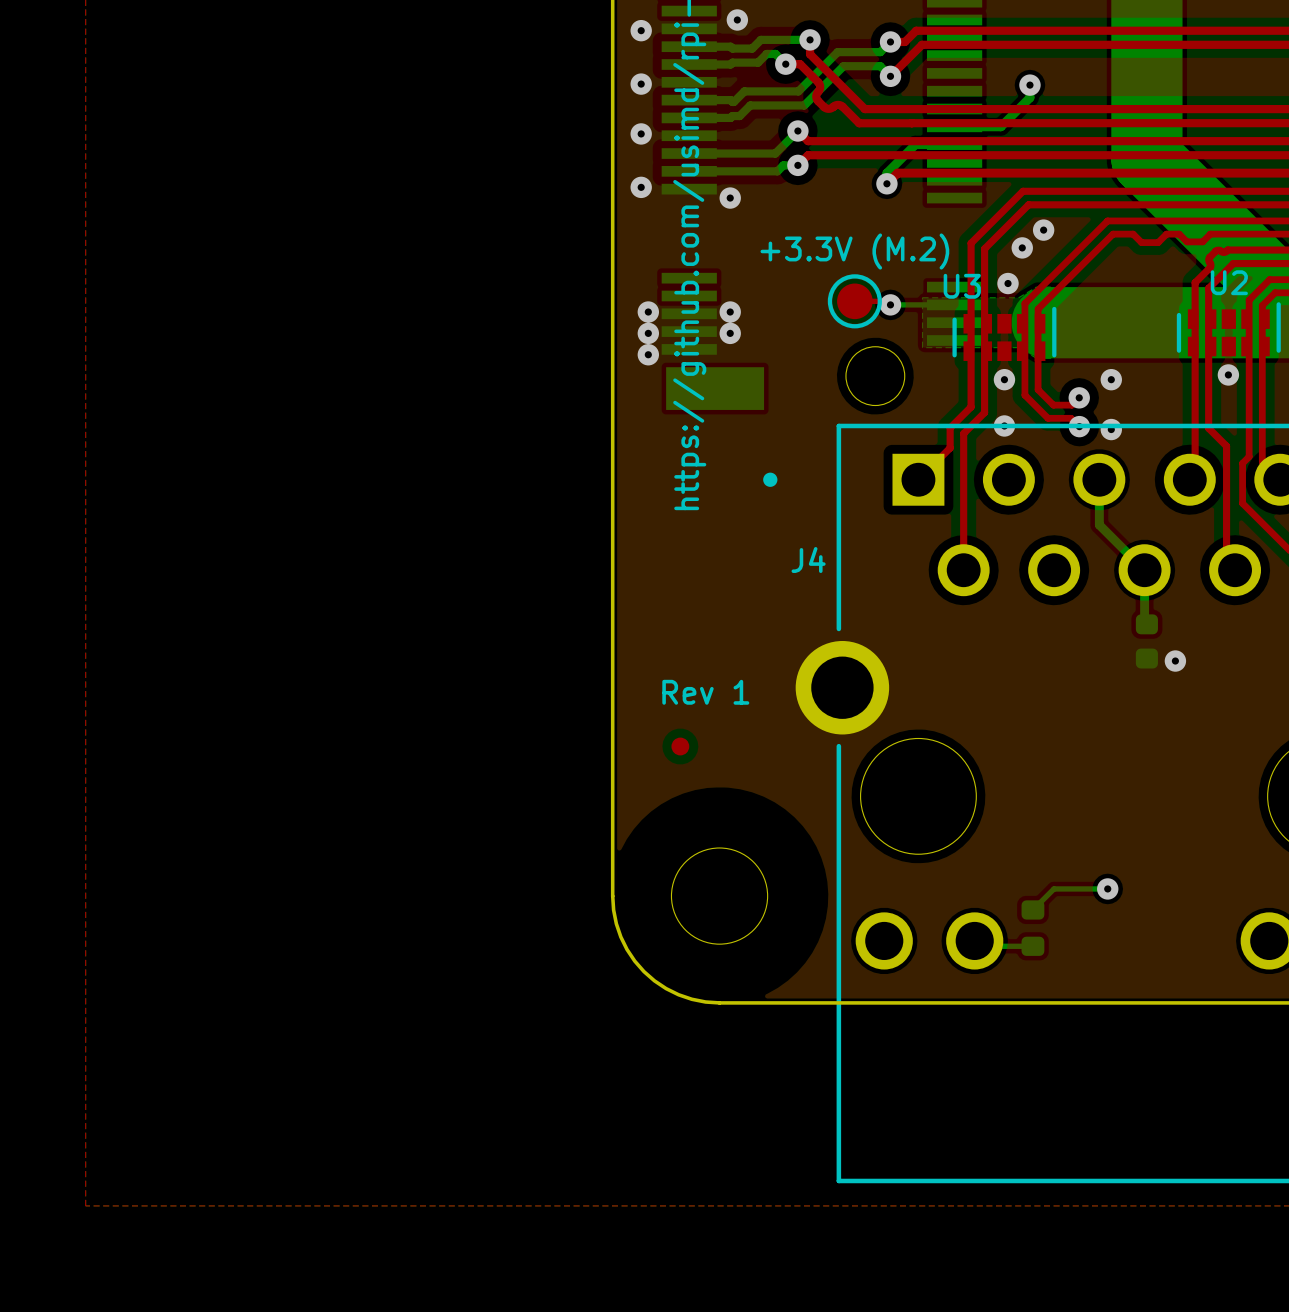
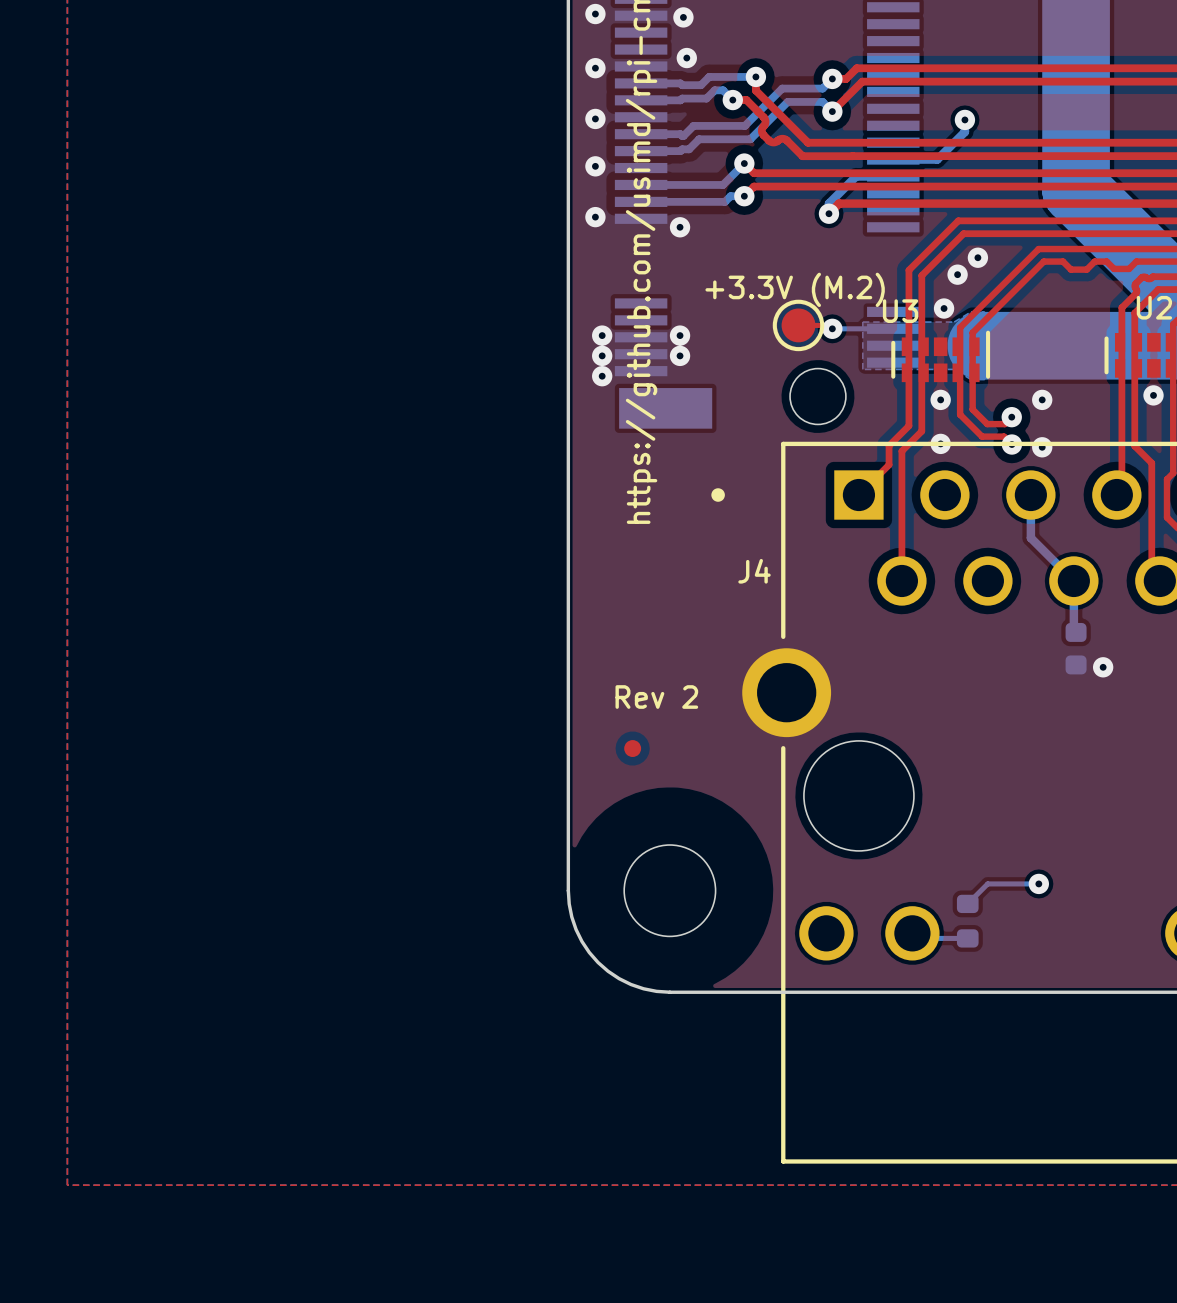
+3.3V (M.2) name: +3.3V (M.2) (854, 251) -> none
text: none -> +3.3V (M.2) (795, 289)
text: Rev 1 (705, 692) -> Rev 2 (656, 697)

